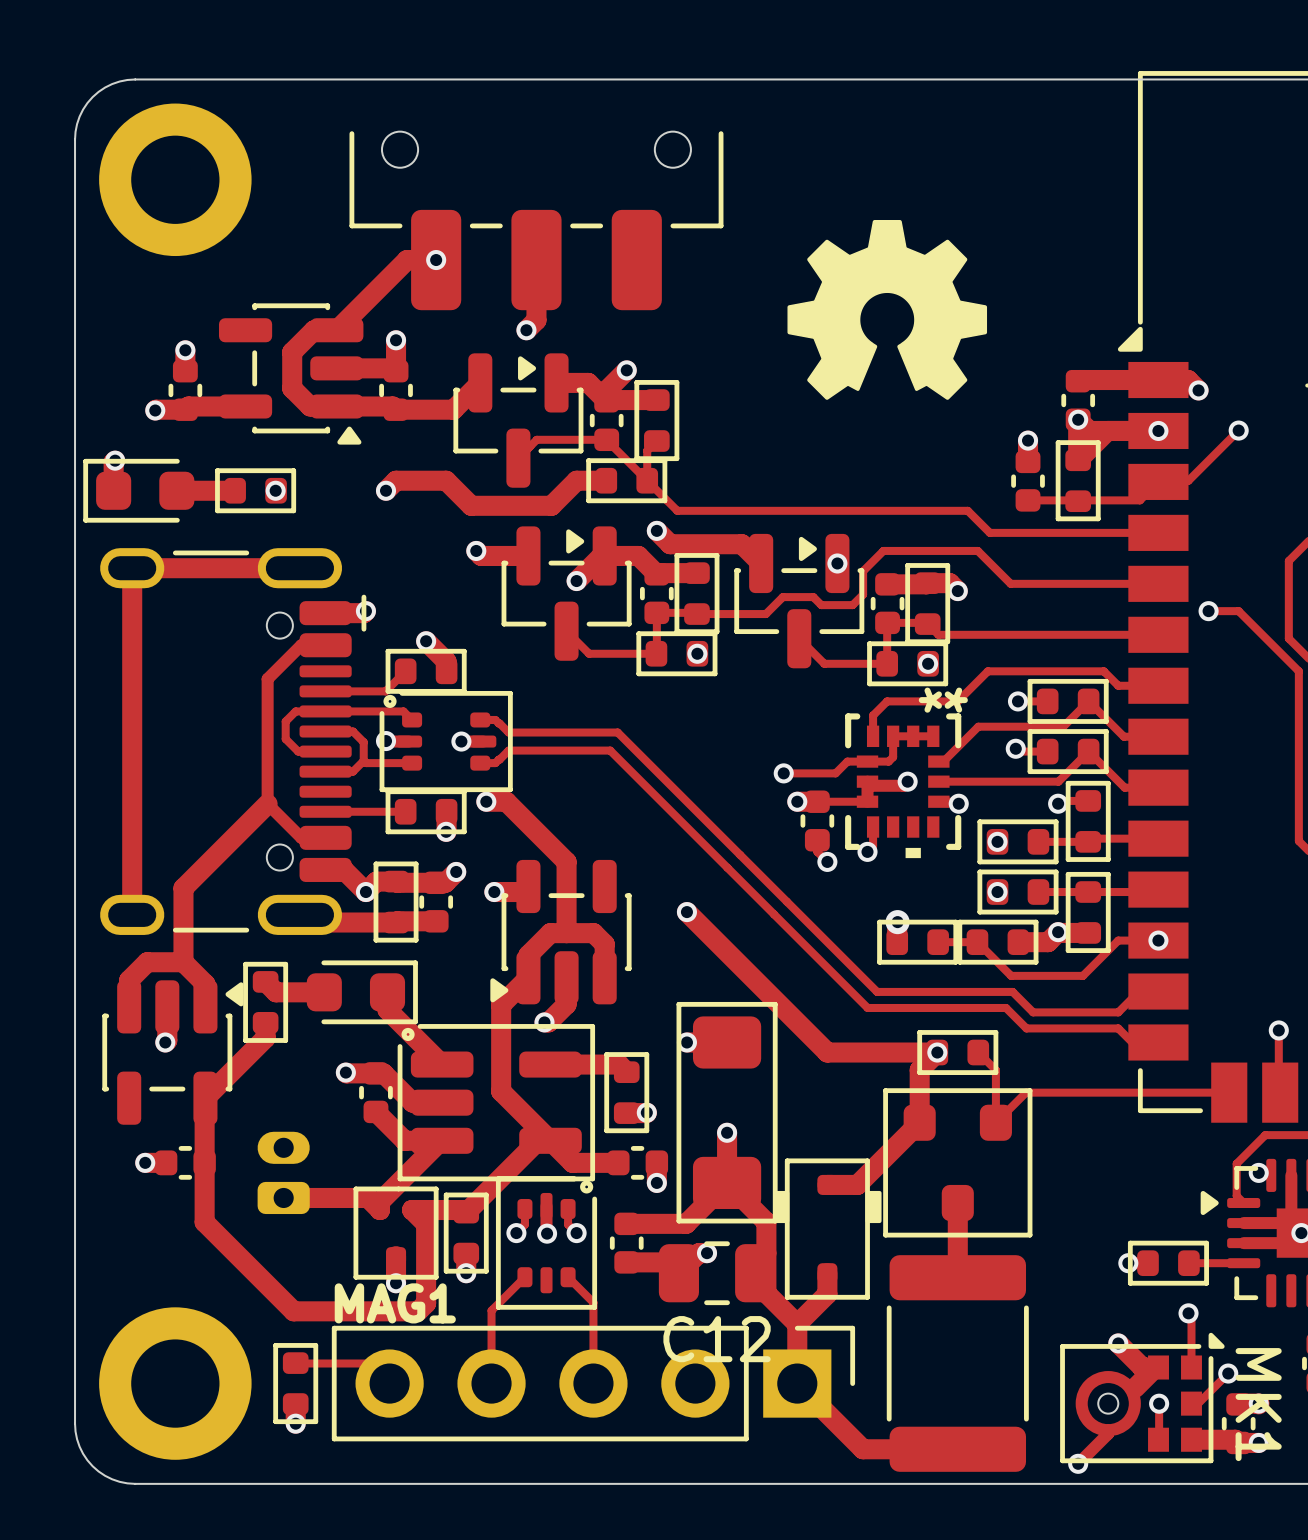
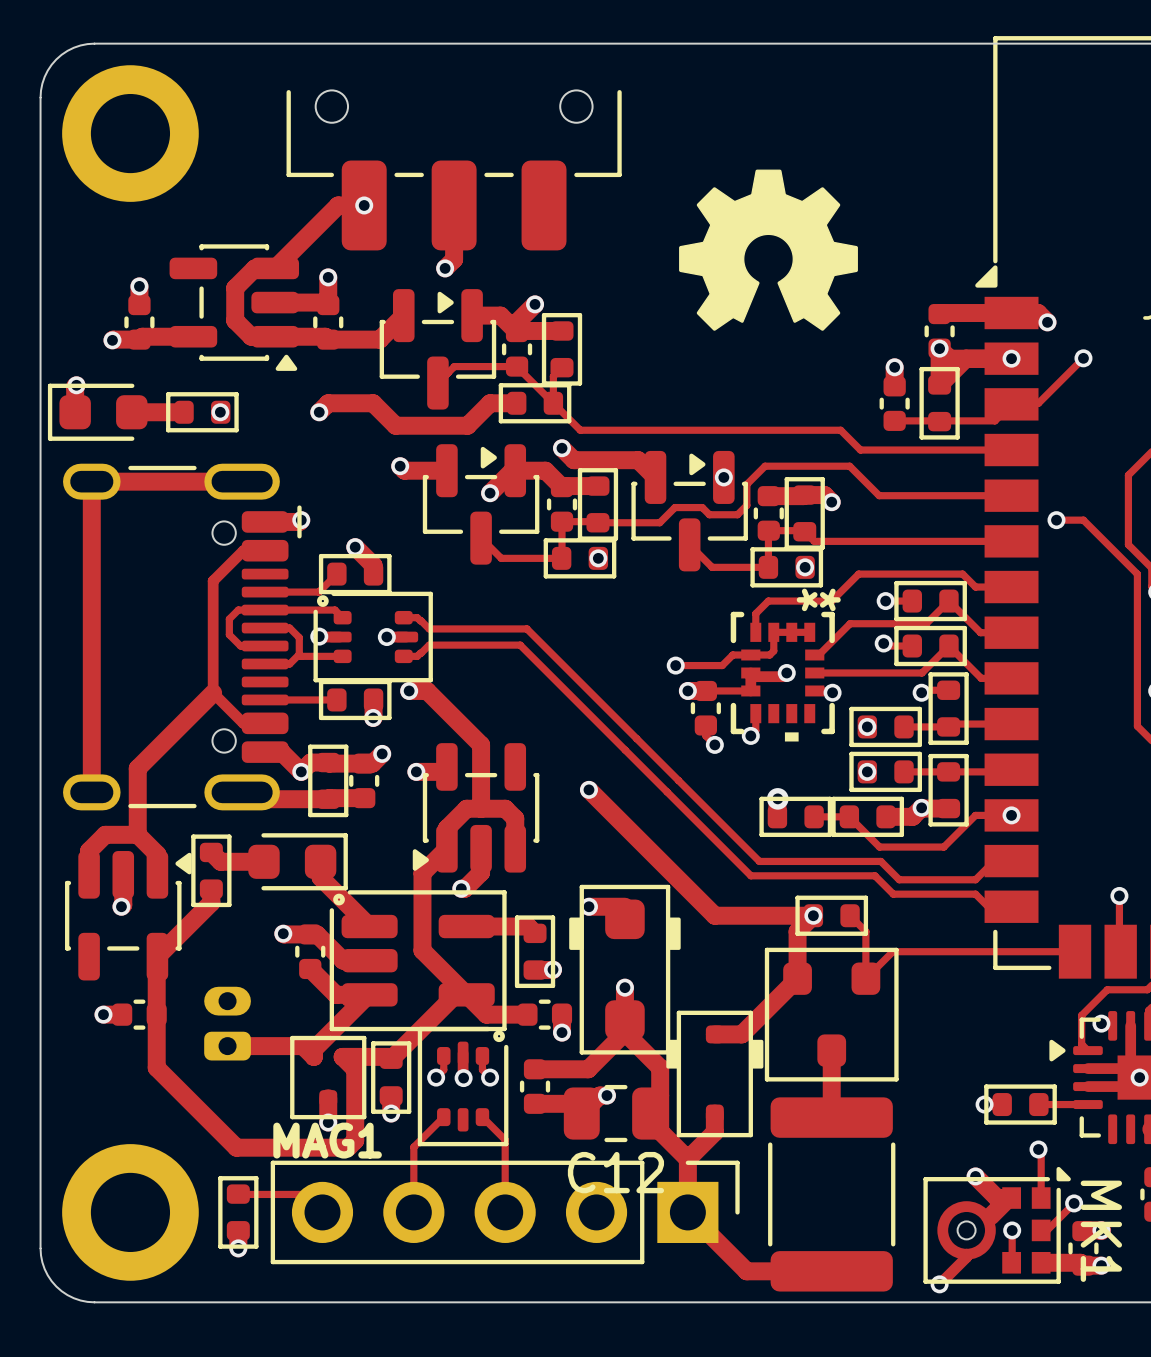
part footprint: [676, 1001, 778, 1224] -> [569, 884, 681, 1055]

